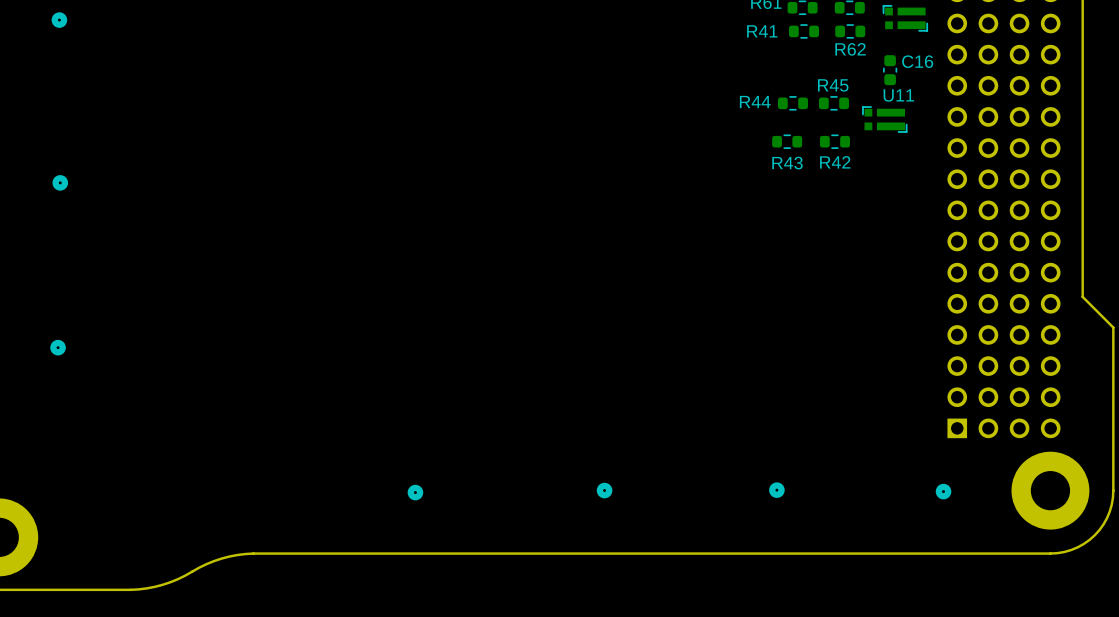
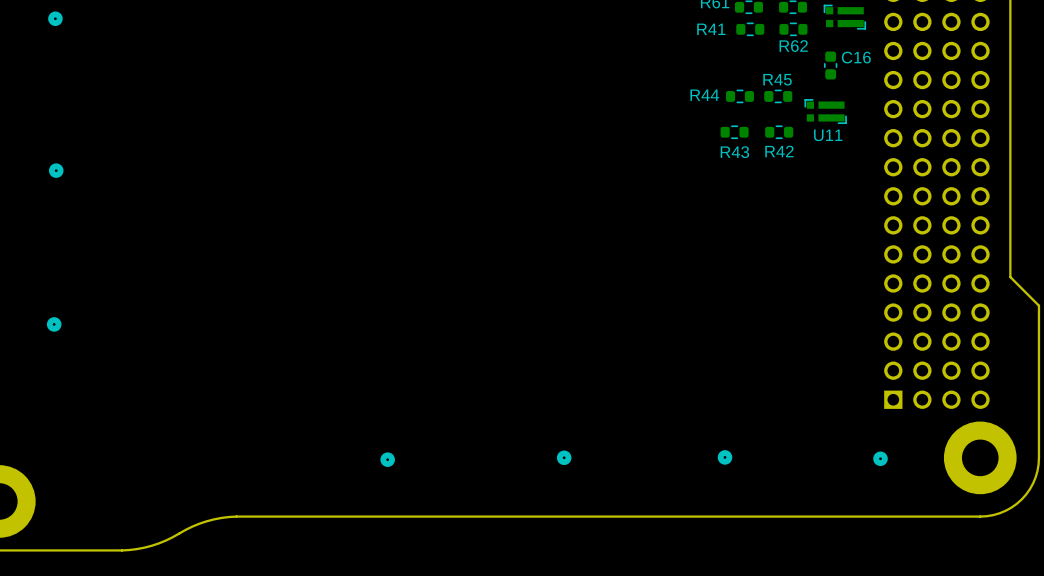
U11 name position: U11 (898, 95) -> U11 (828, 135)

